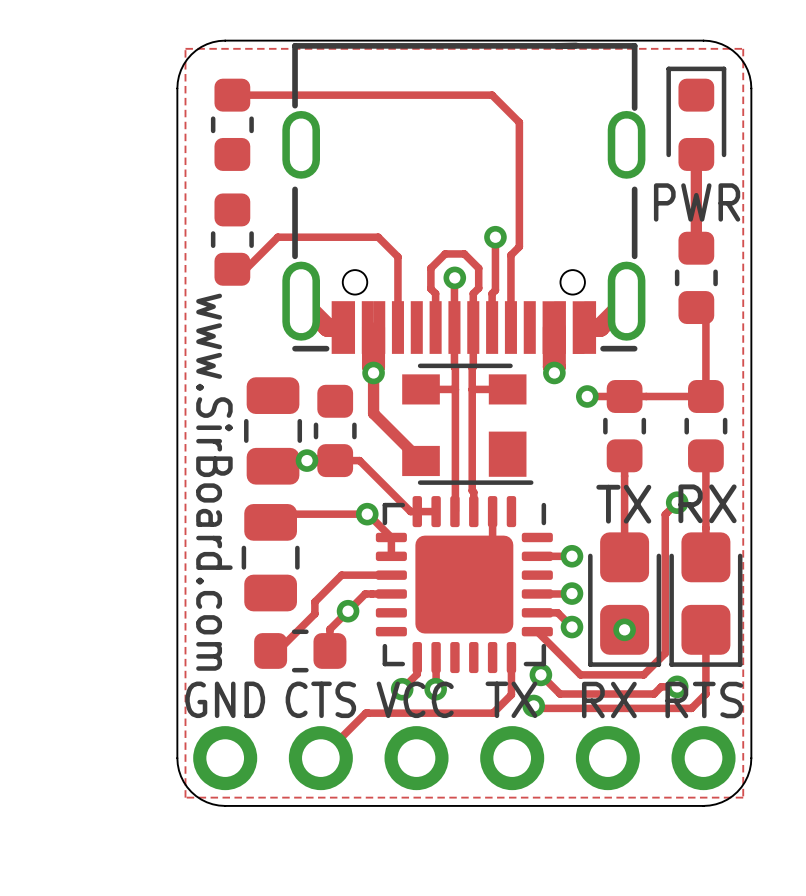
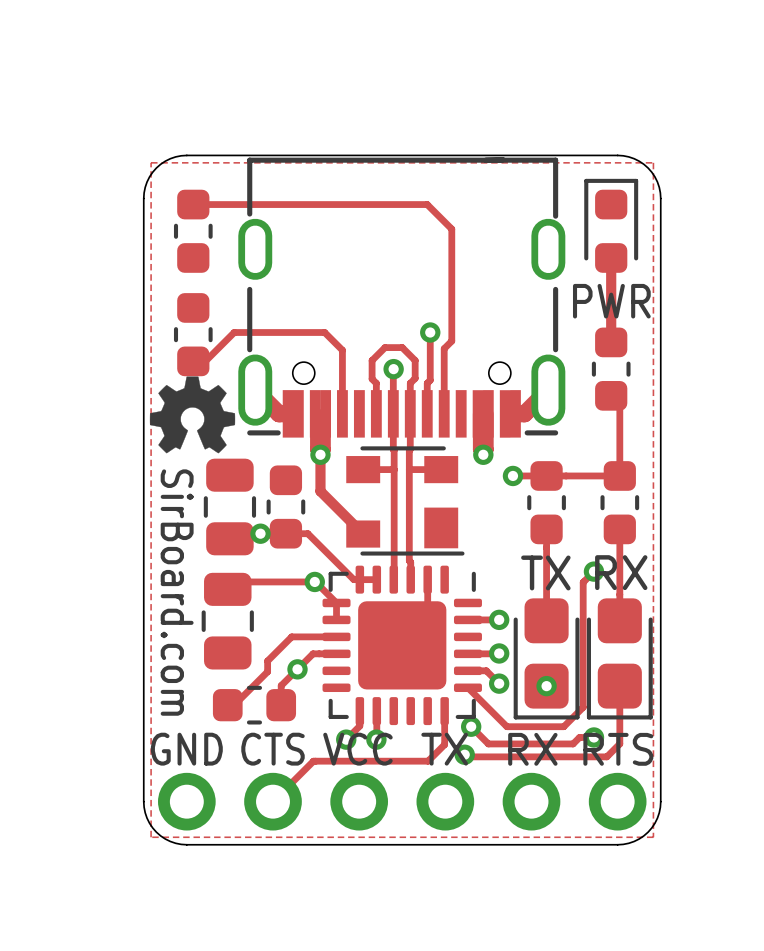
drawing: none -> [149, 376, 236, 454]
text: www.SirBoard.com (214, 482) -> SirBoard.com (177, 592)

